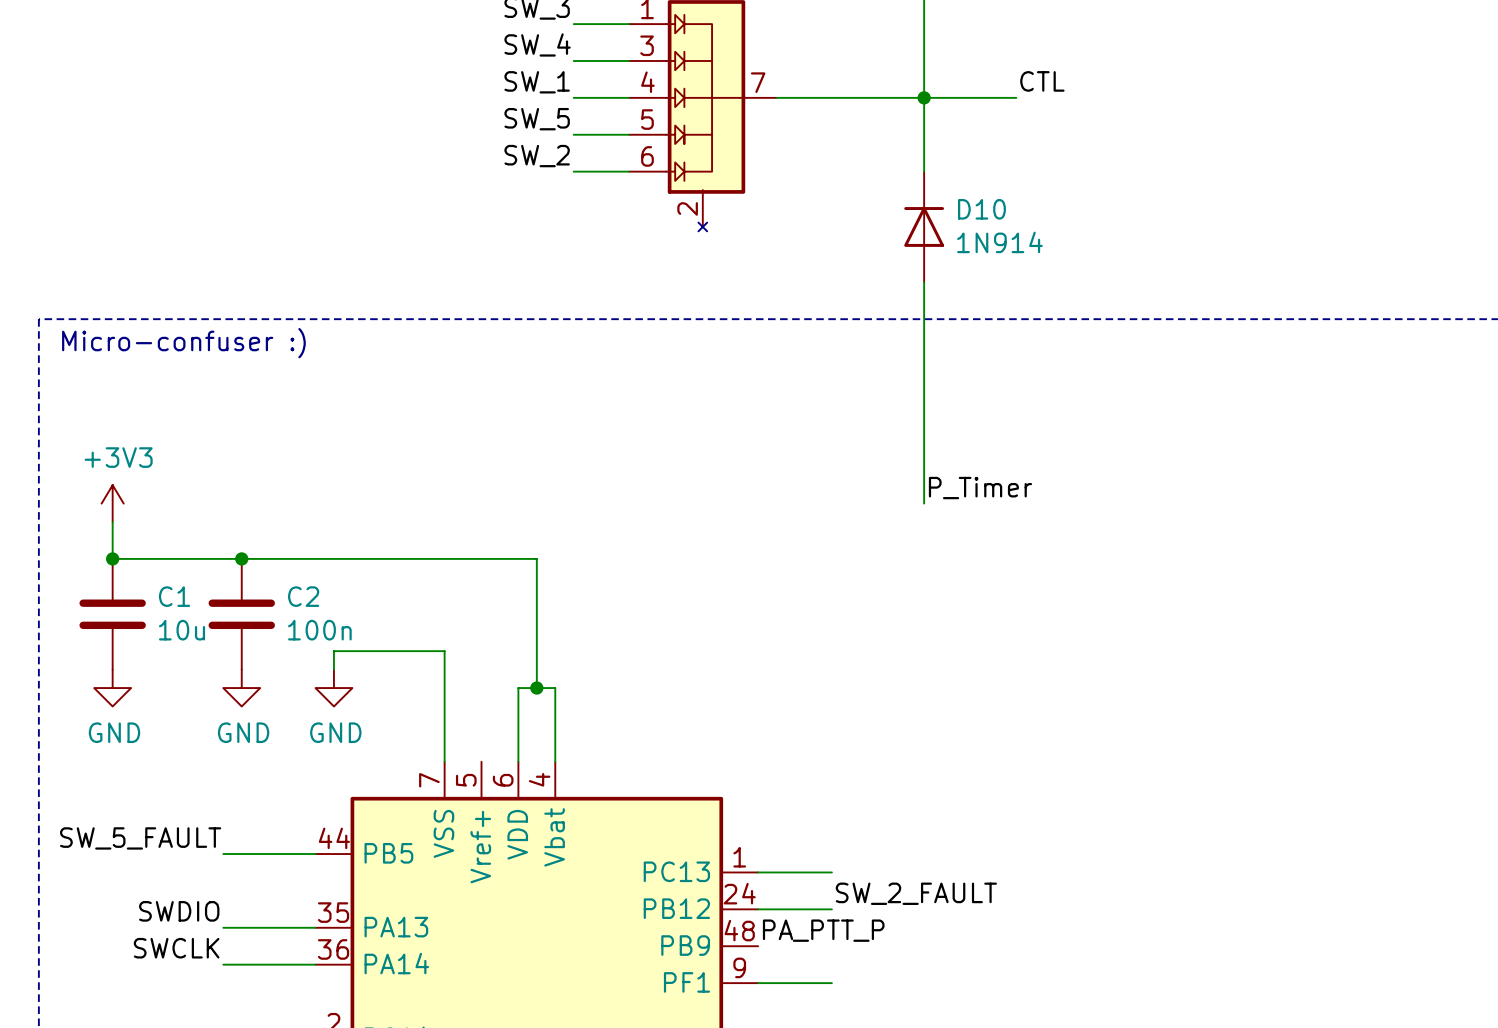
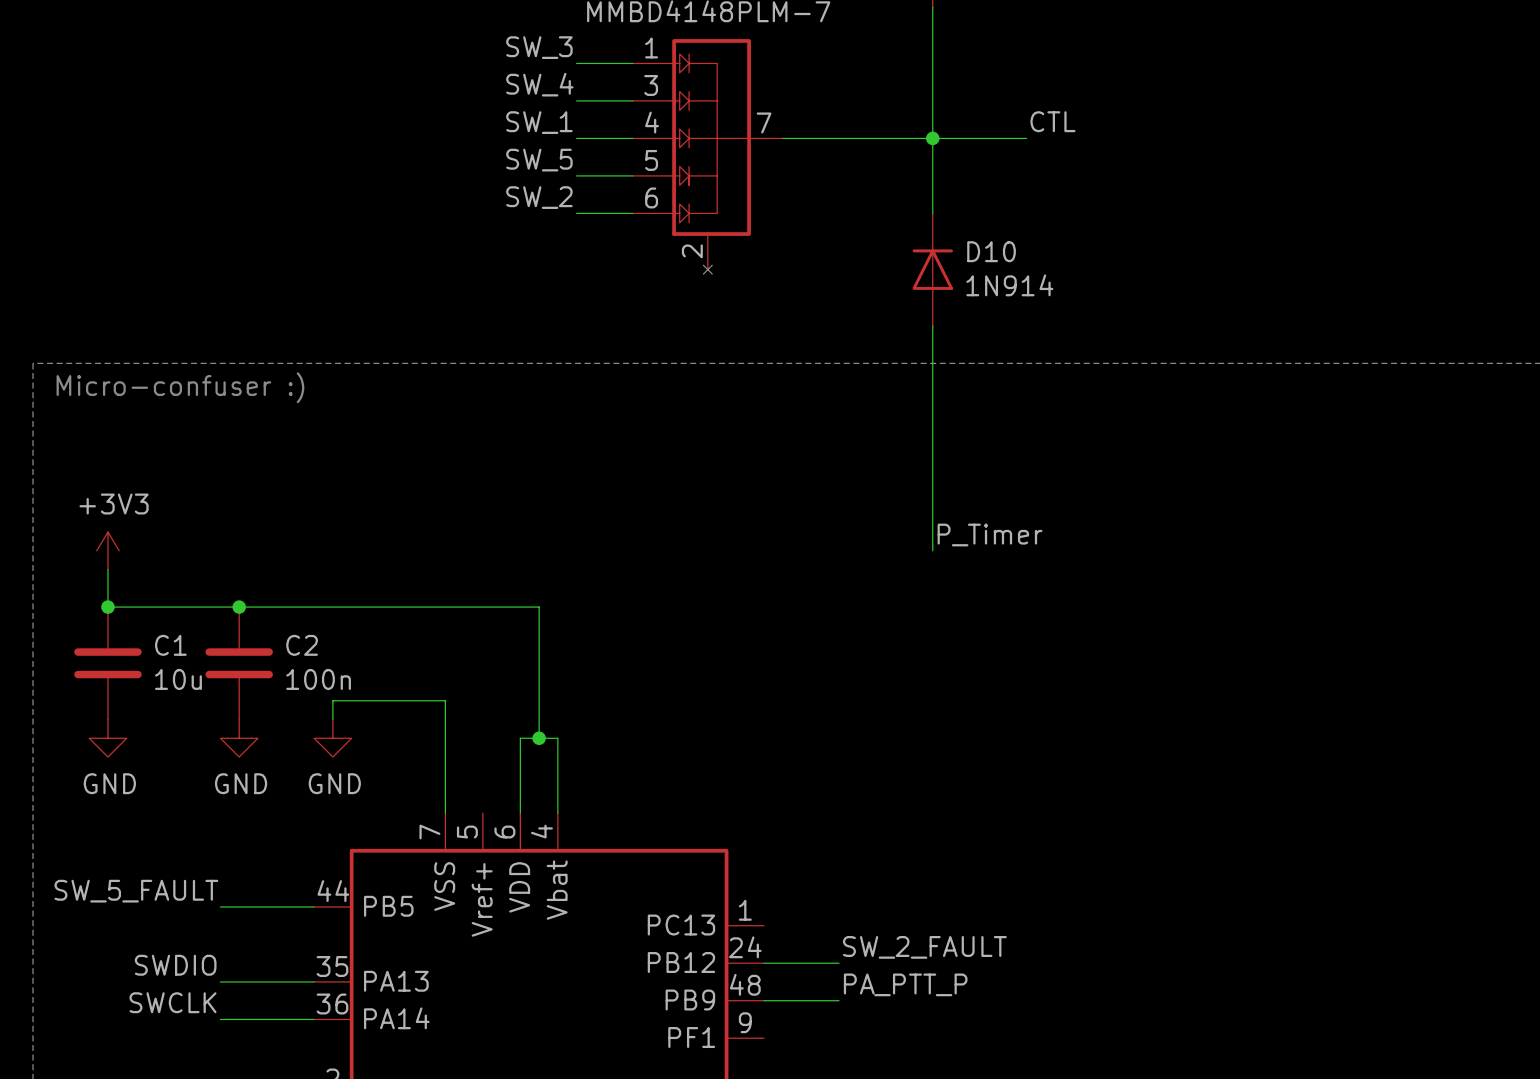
wire: (758, 872) (831, 872) -> none
label position: PA_PTT_P (823, 930) -> PA_PTT_P (905, 984)
wire: (758, 983) (831, 983) -> (764, 1000) (839, 1000)

